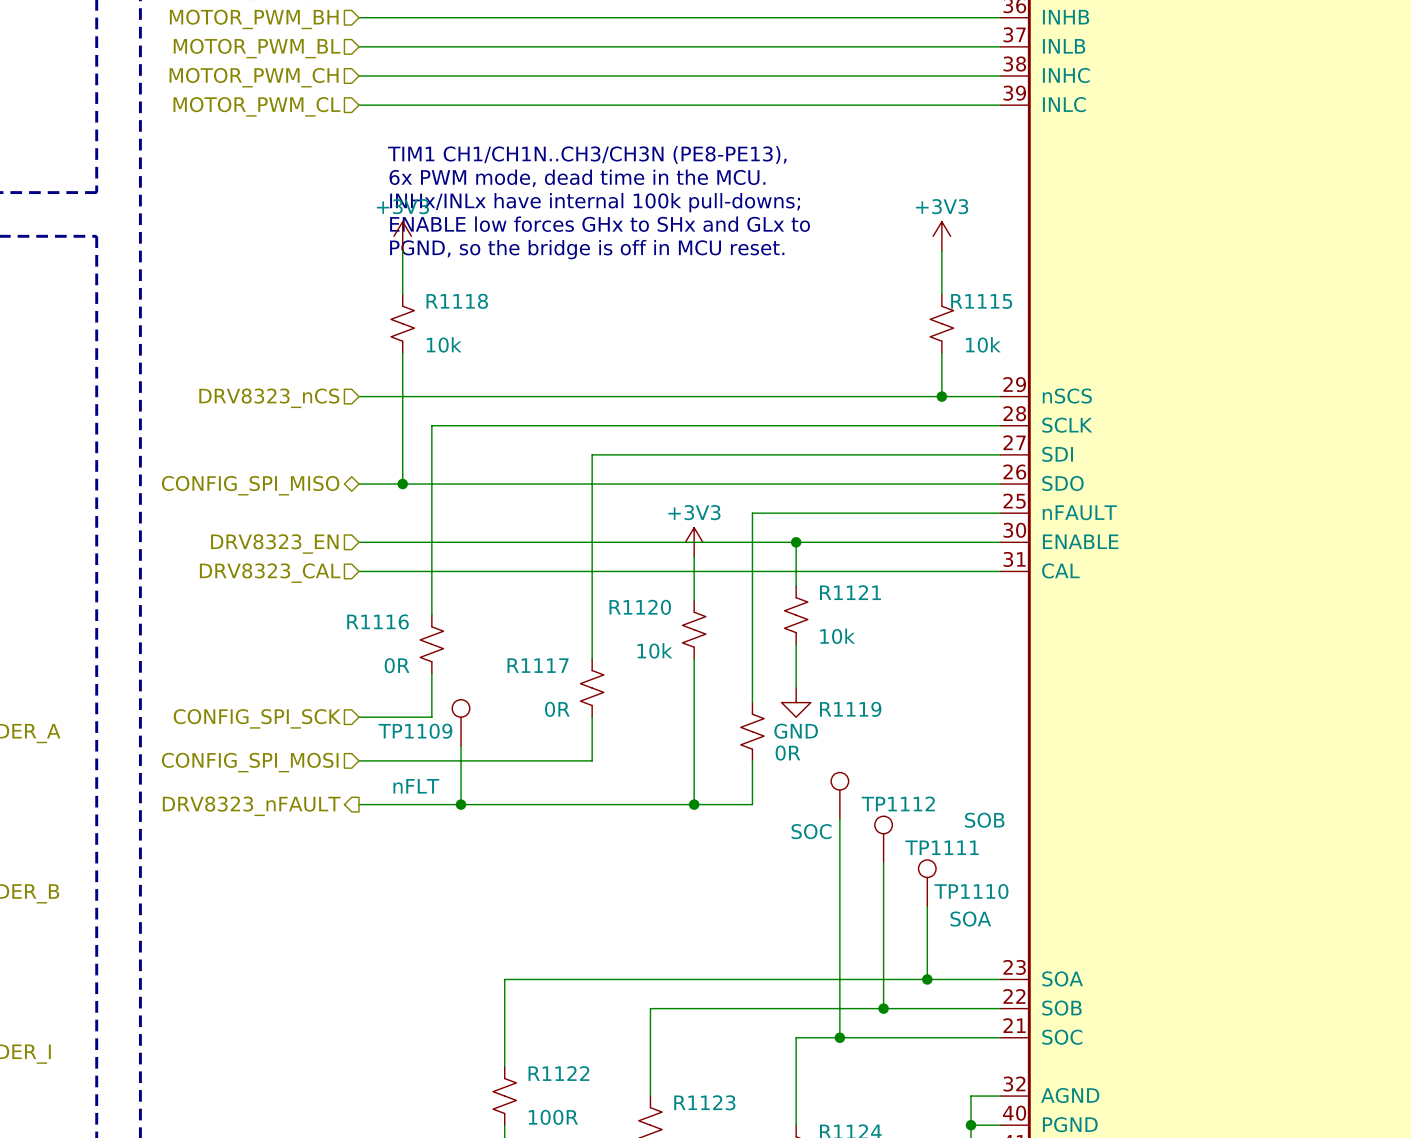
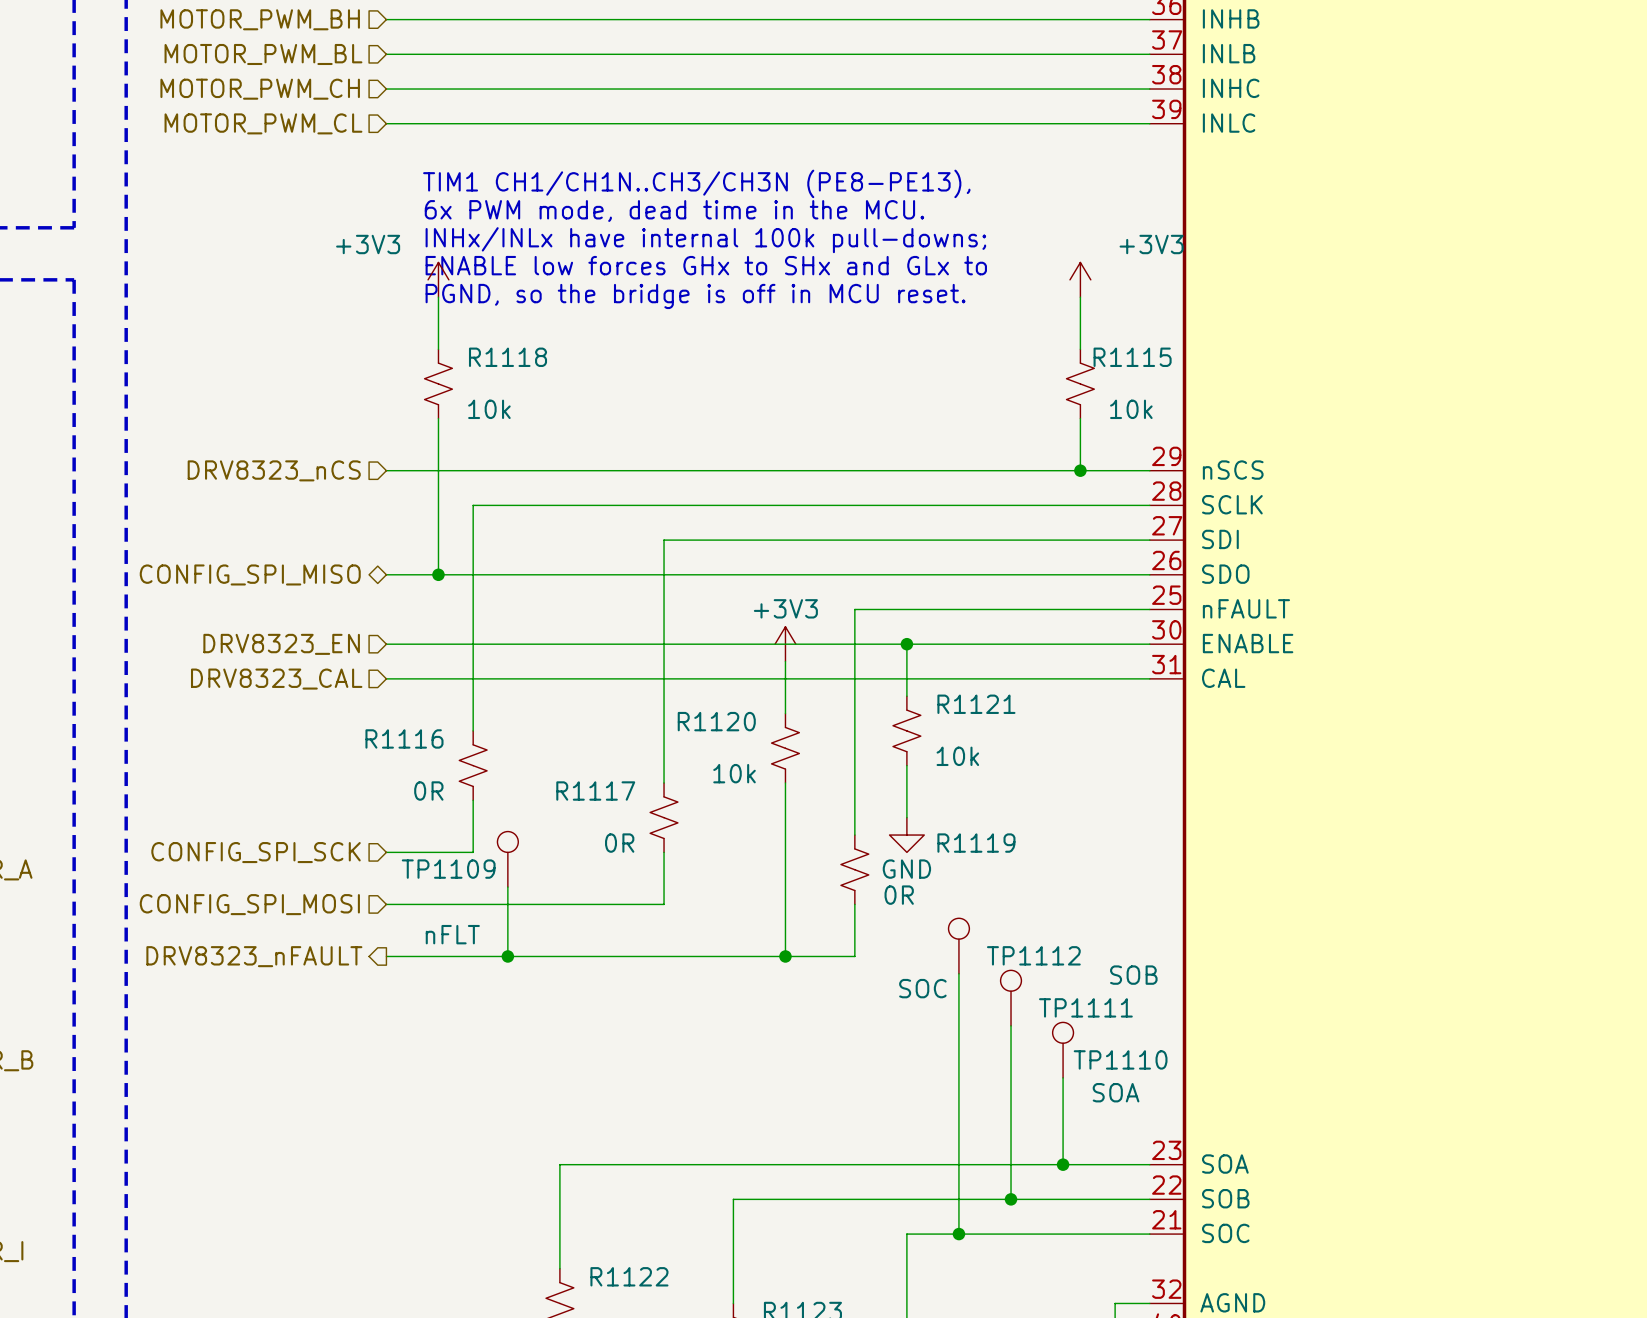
power symbol text position: +3V3 (402, 206) -> +3V3 (368, 244)
power symbol text position: +3V3 (942, 206) -> +3V3 (1151, 244)

